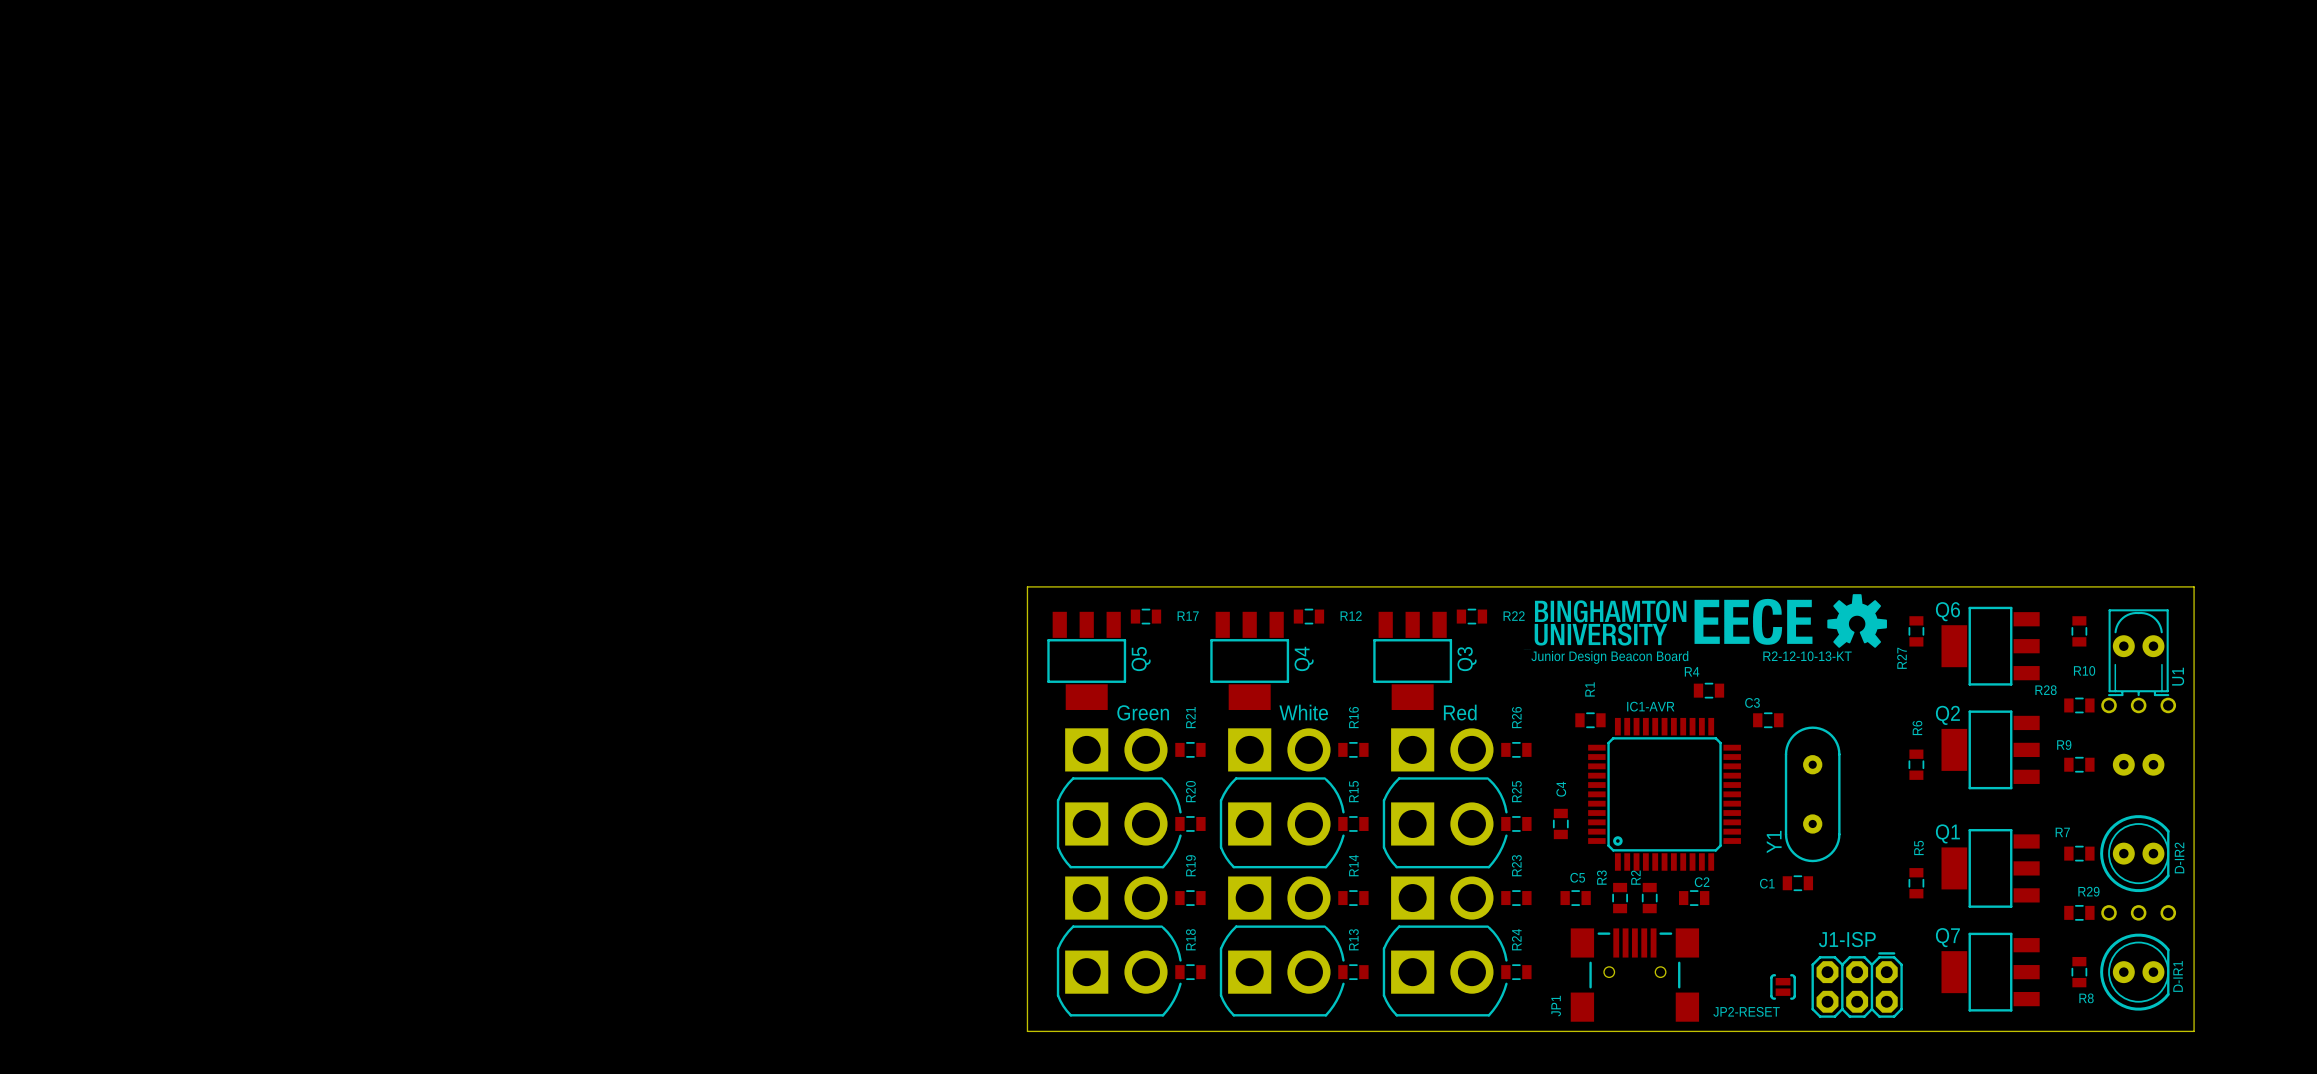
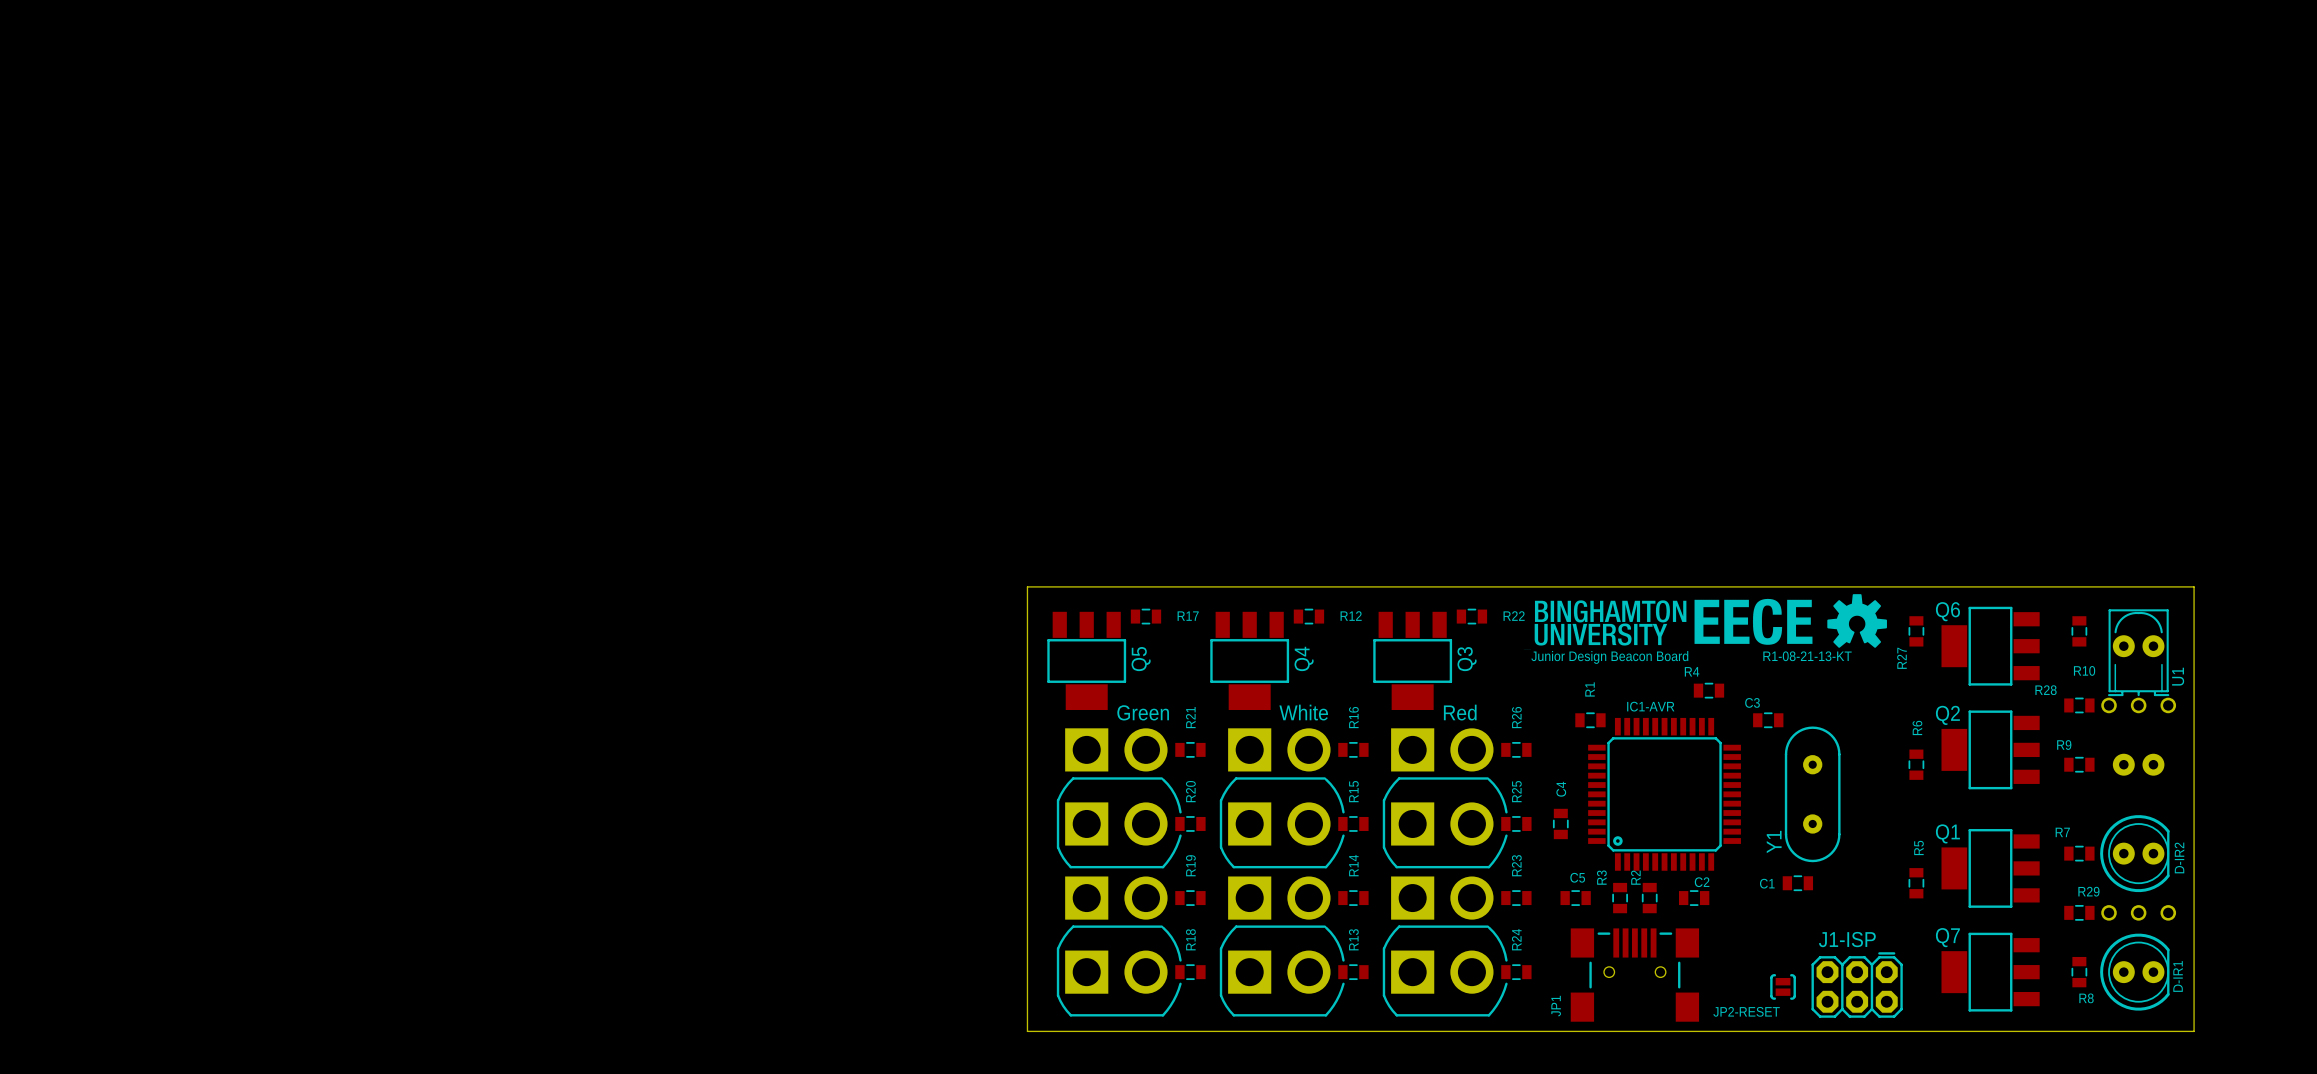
text: R2-12-10-13-KT (1807, 656) -> R1-08-21-13-KT (1807, 656)

